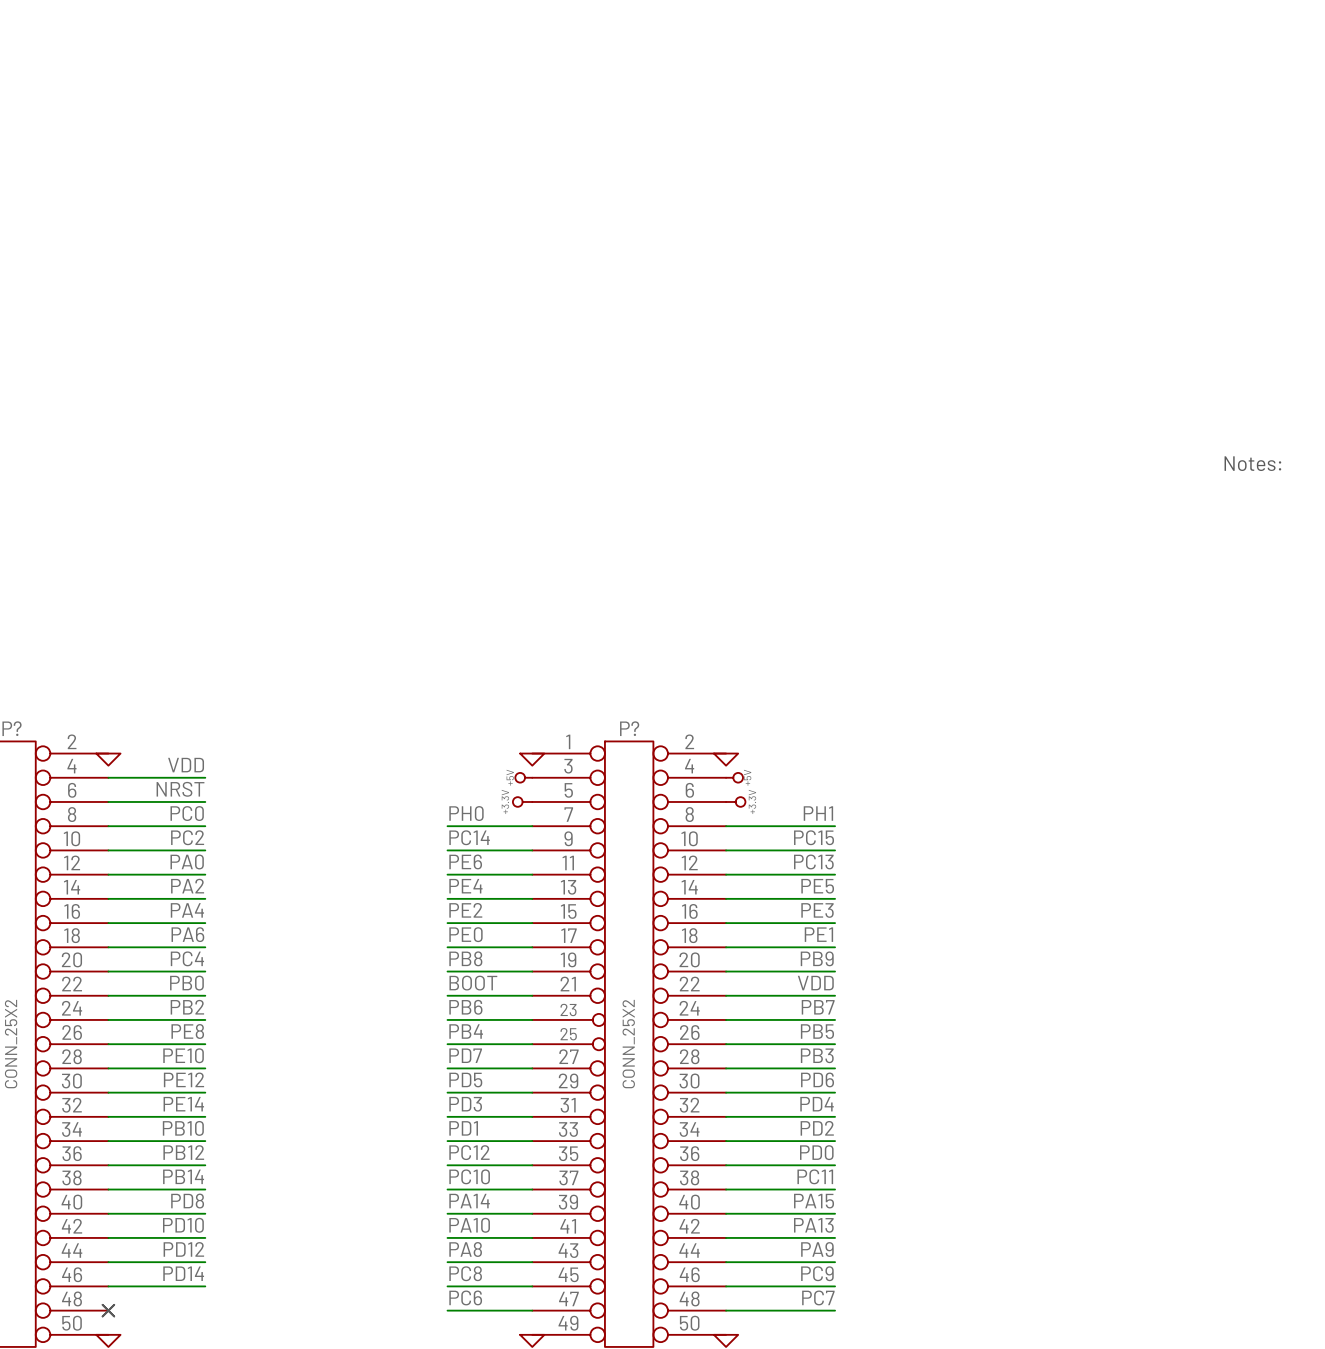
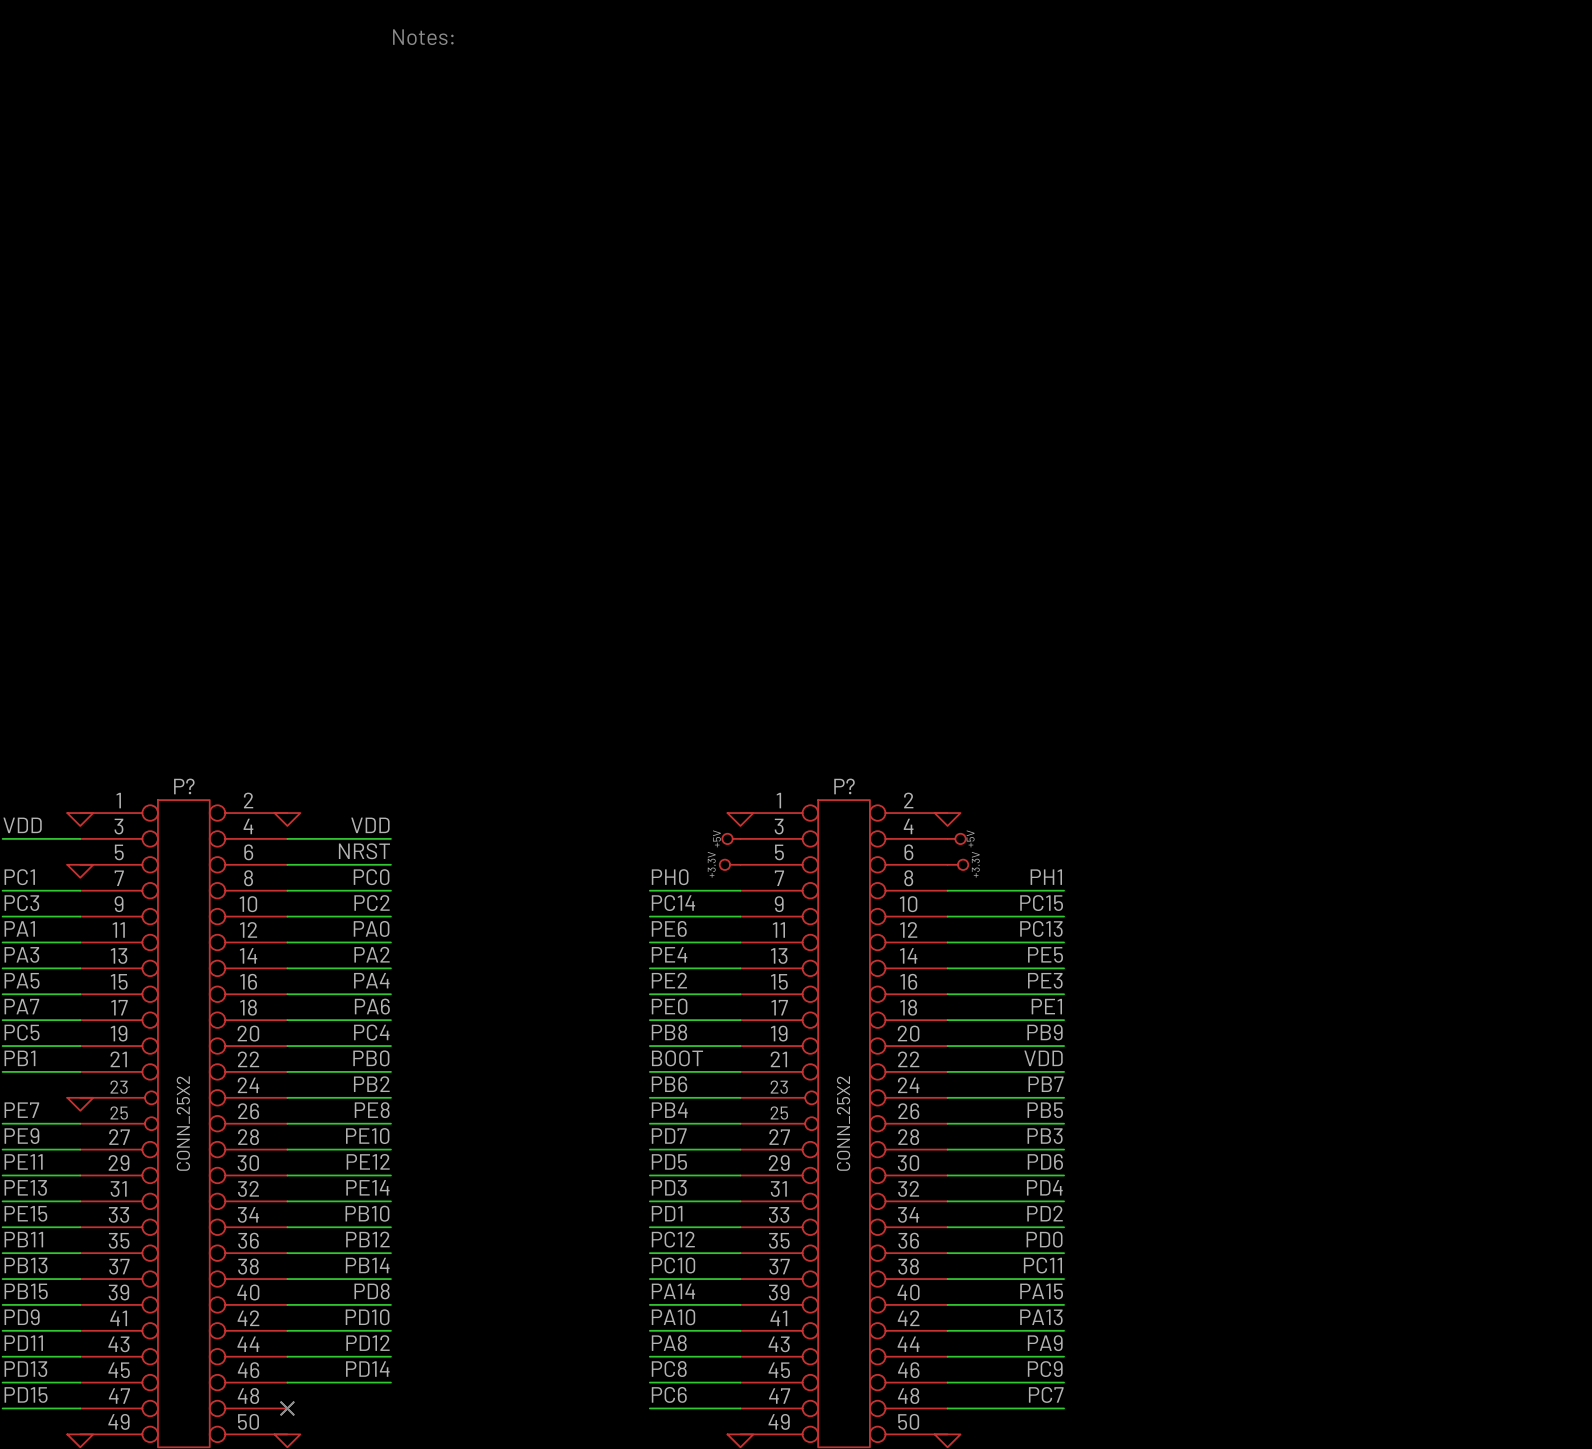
text: none -> Notes: (423, 37)
text: Notes: (1252, 463) -> none

